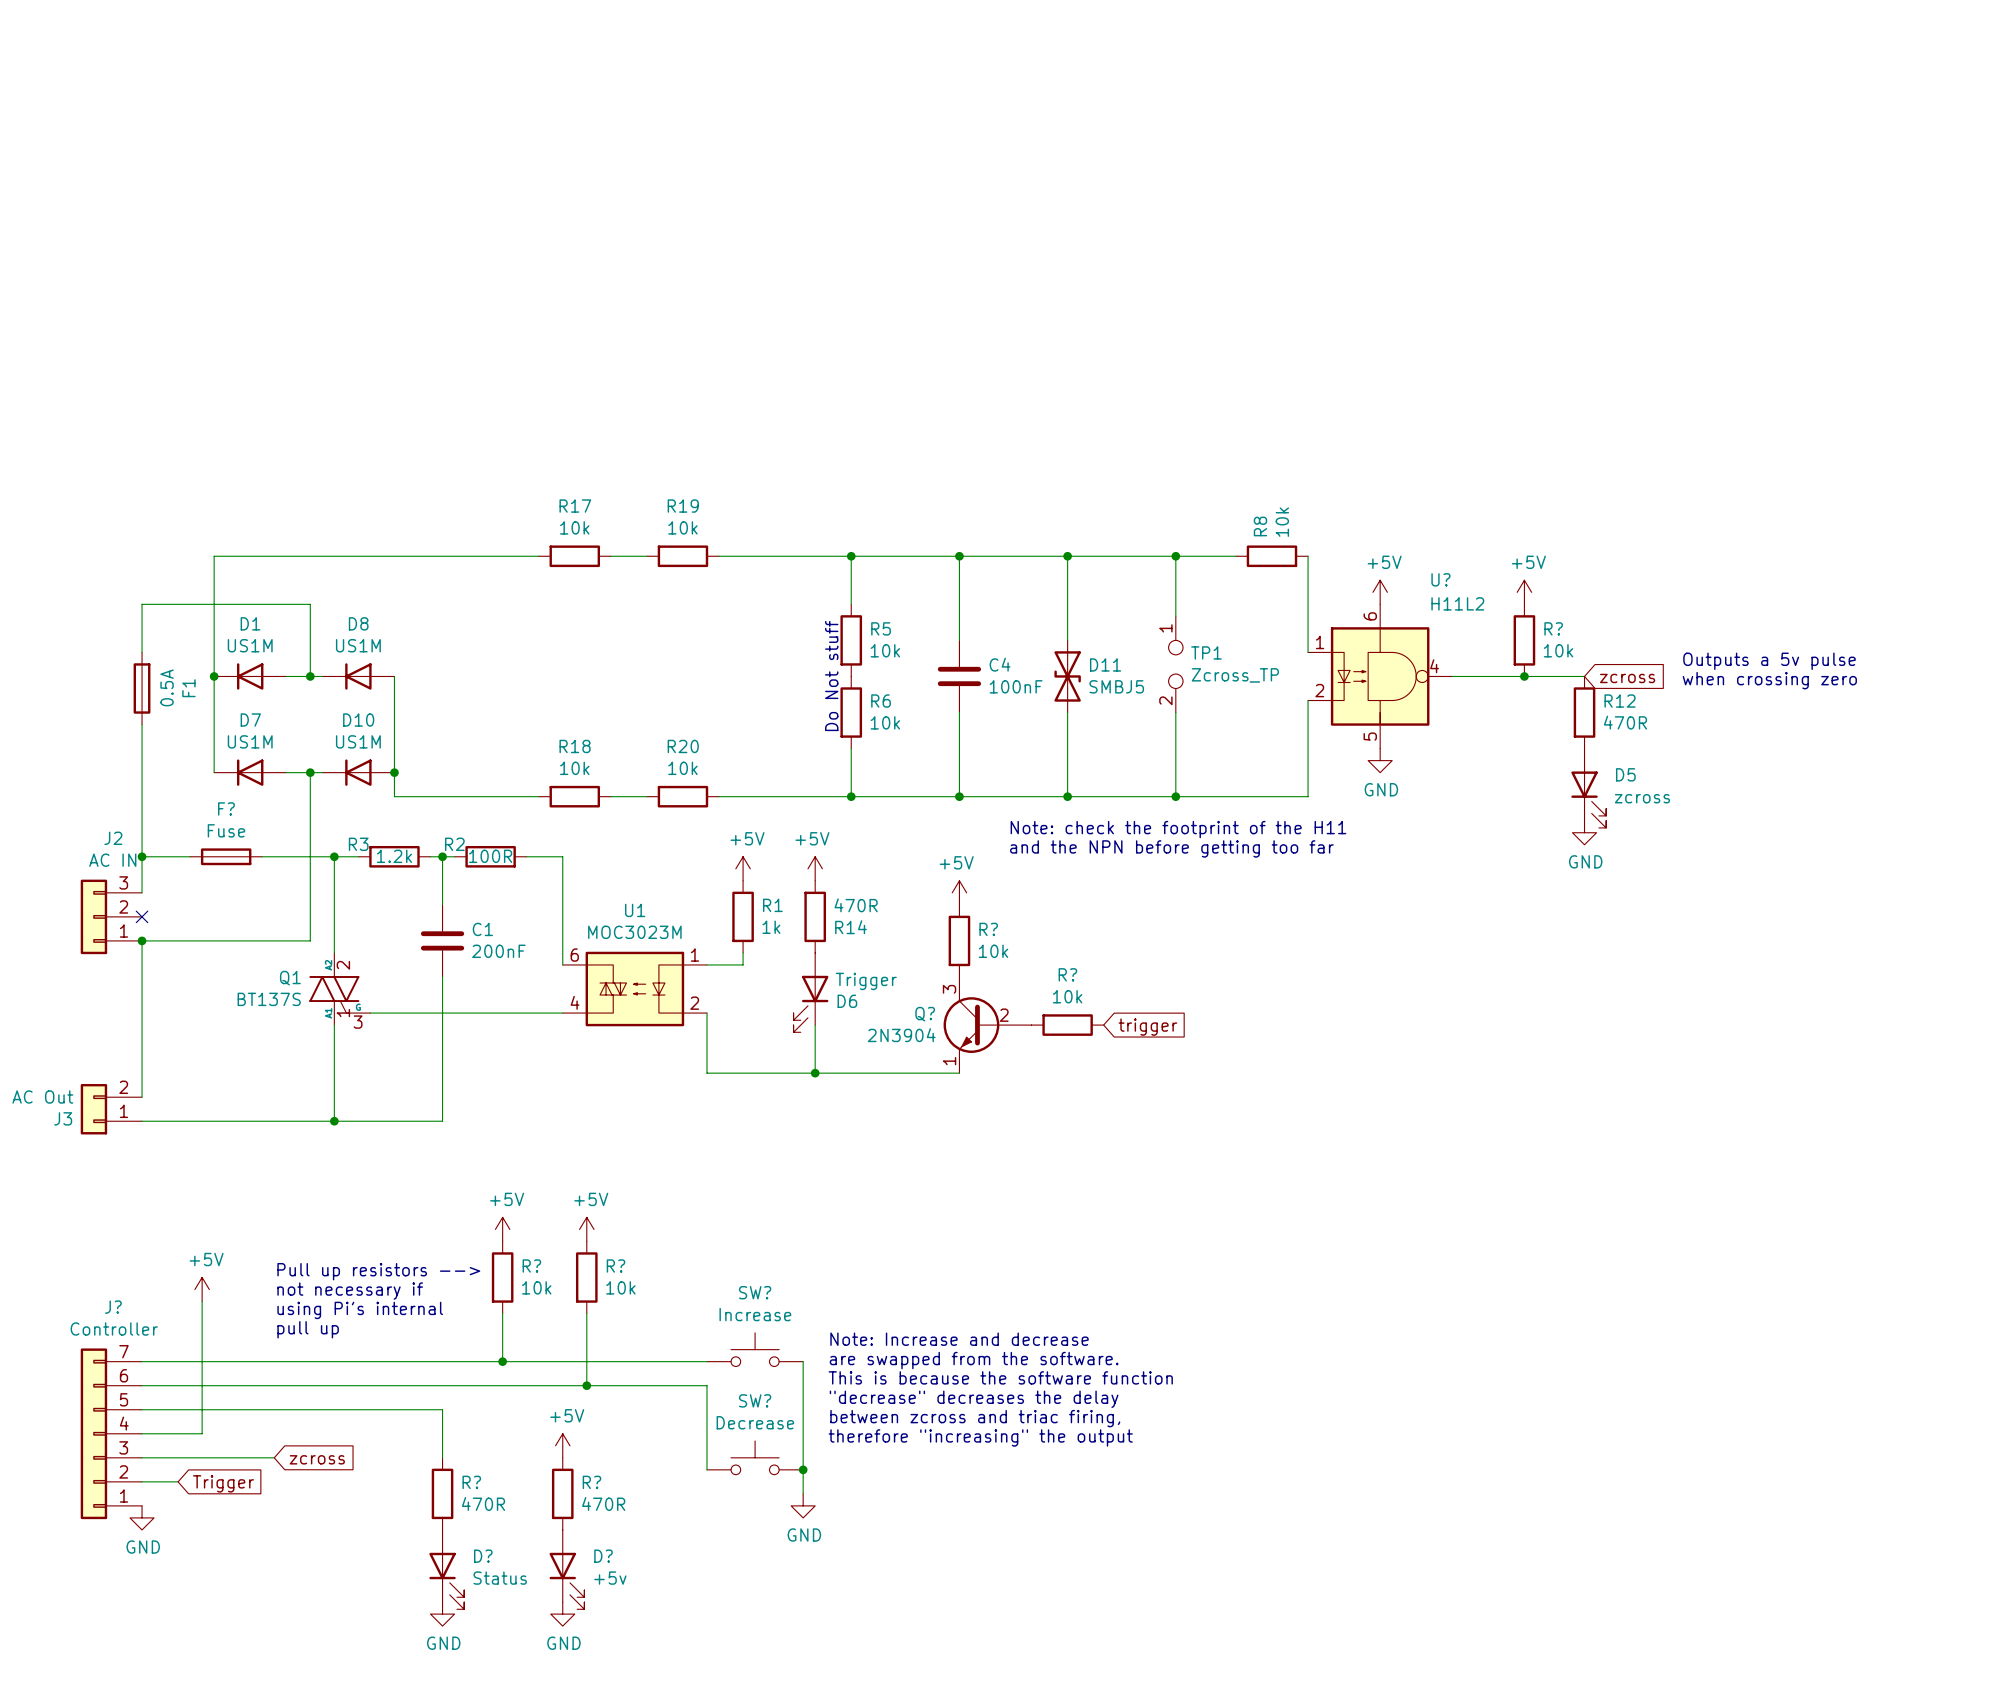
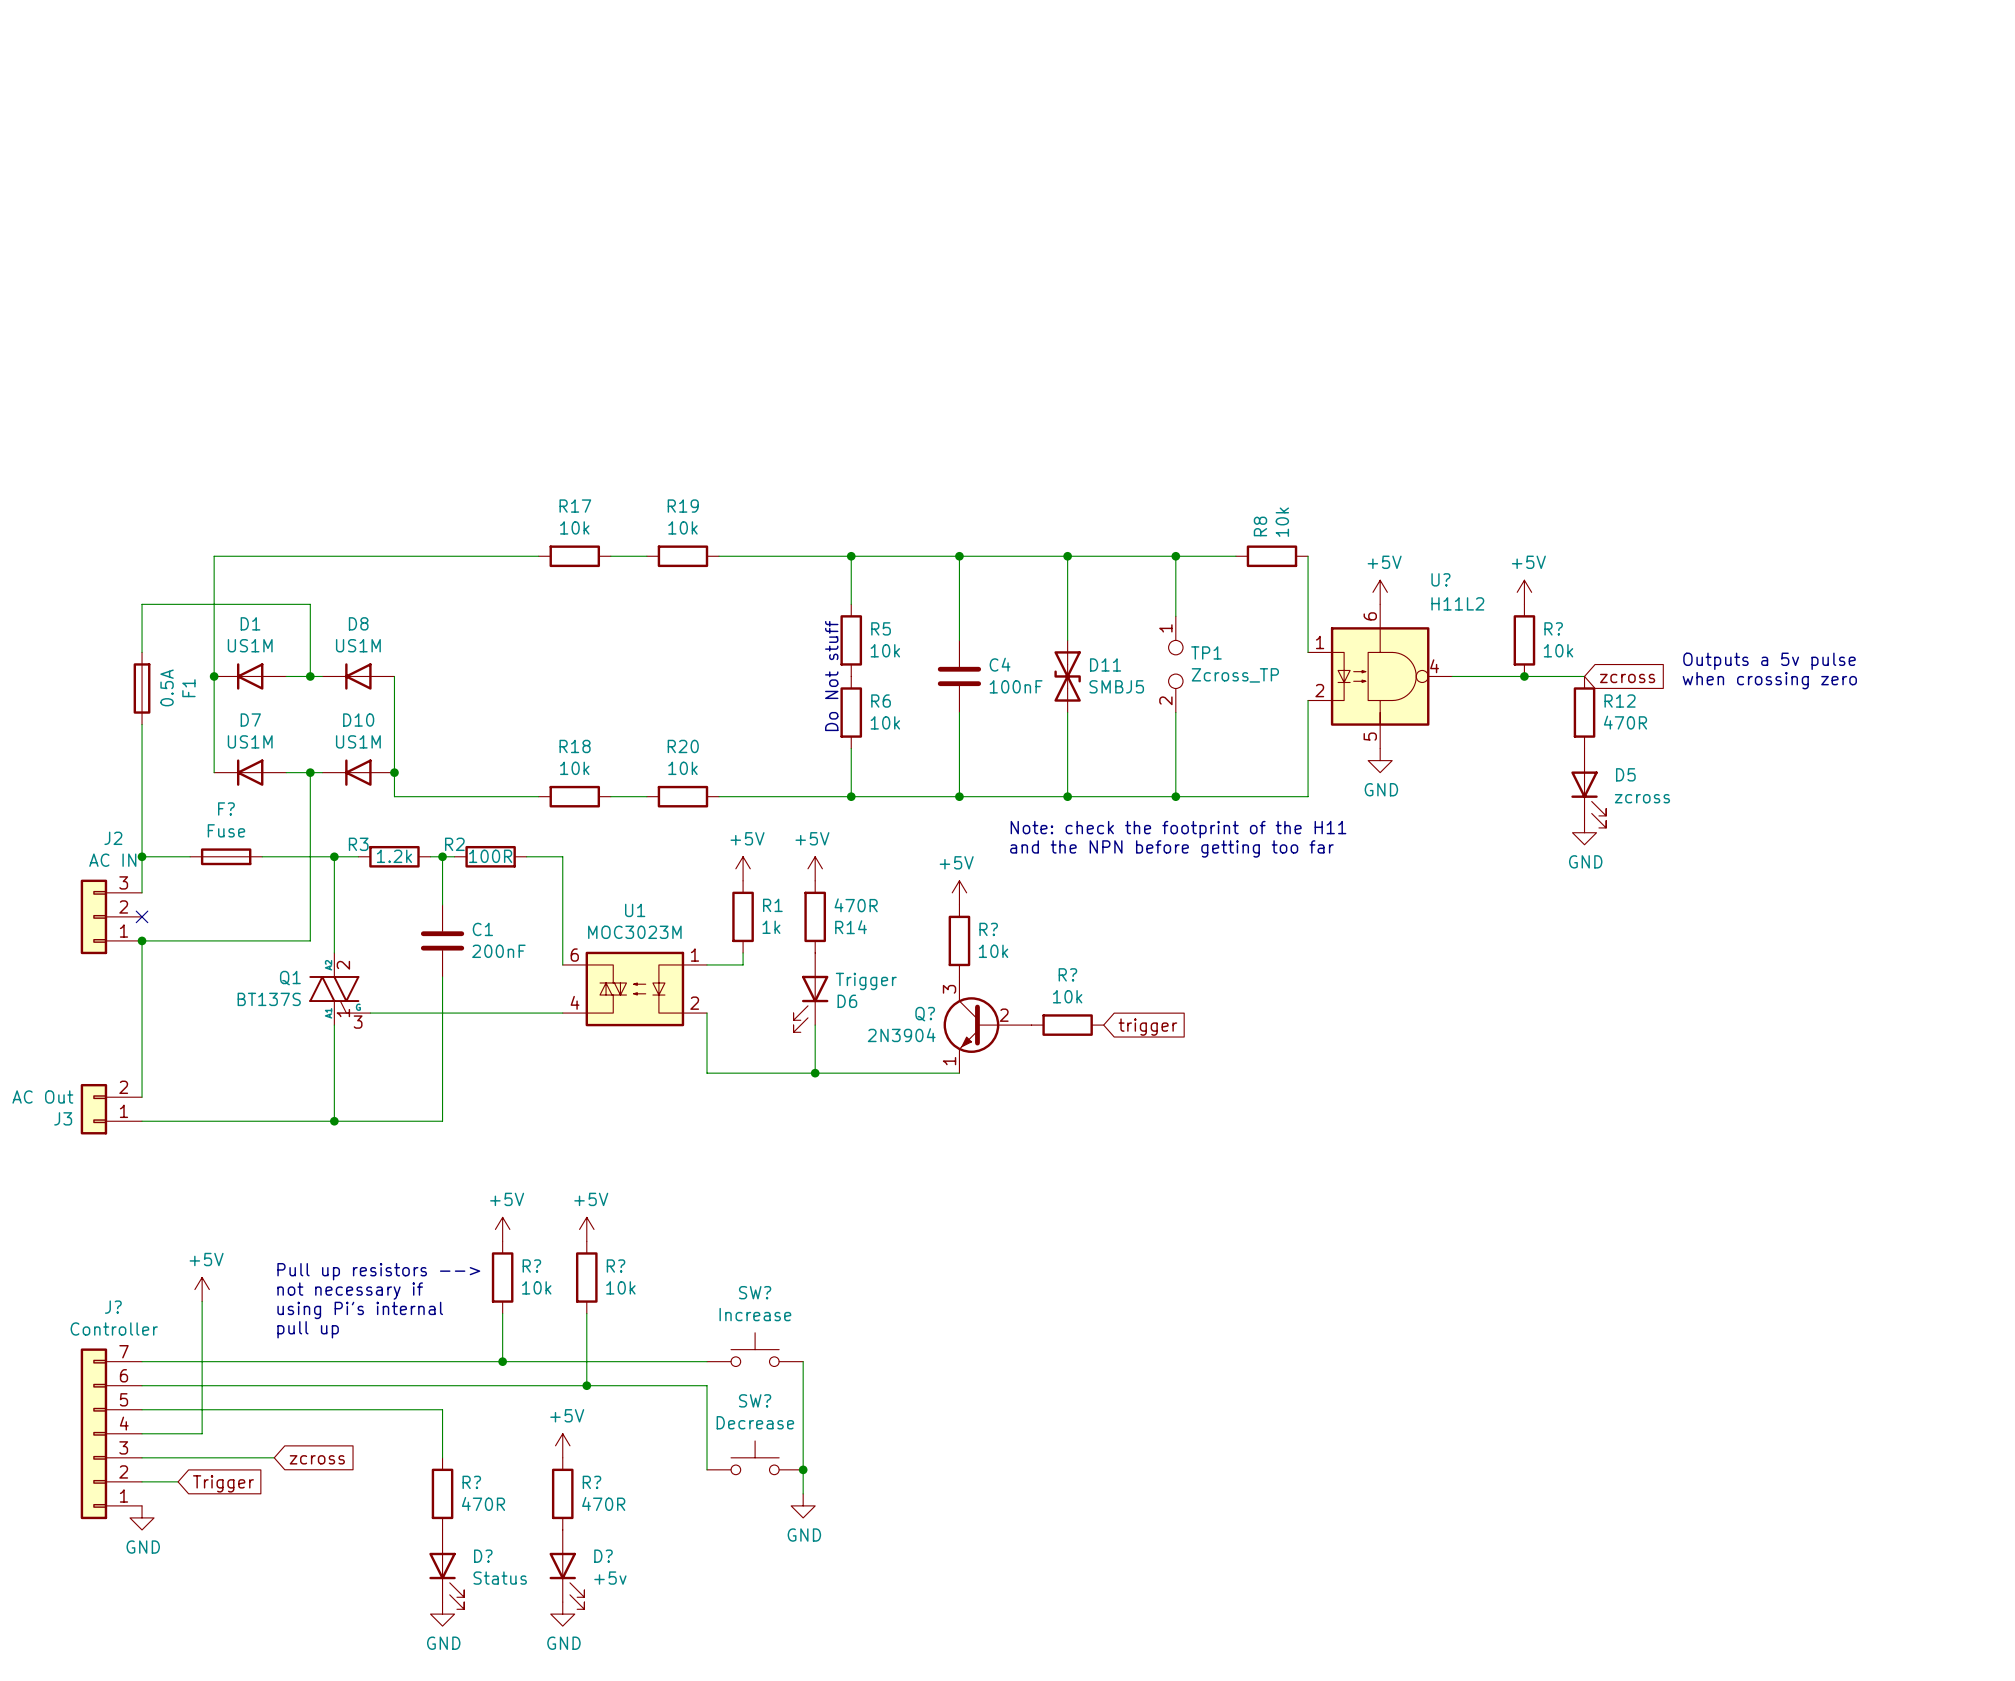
text: Note: Increase and decrease (959, 1339) -> none
text: are swapped from the software. (974, 1360) -> none
text: This is because the software function (1000, 1377) -> none
text: "decrease" decreases the delay (974, 1399) -> none
text: between zcross and triac firing, (975, 1418) -> none
text: therefore "increasing" the output (980, 1437) -> none

